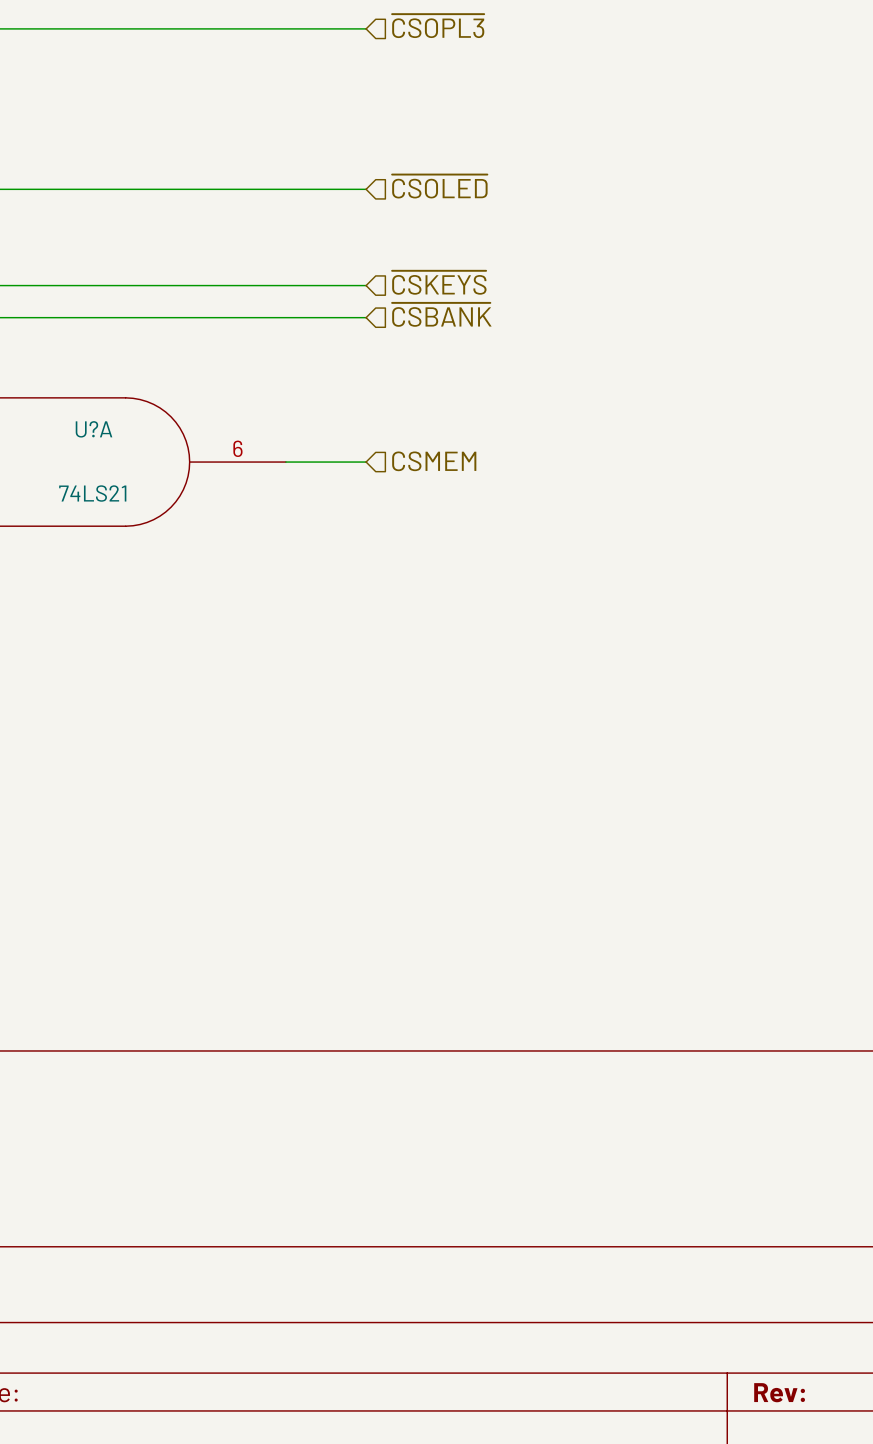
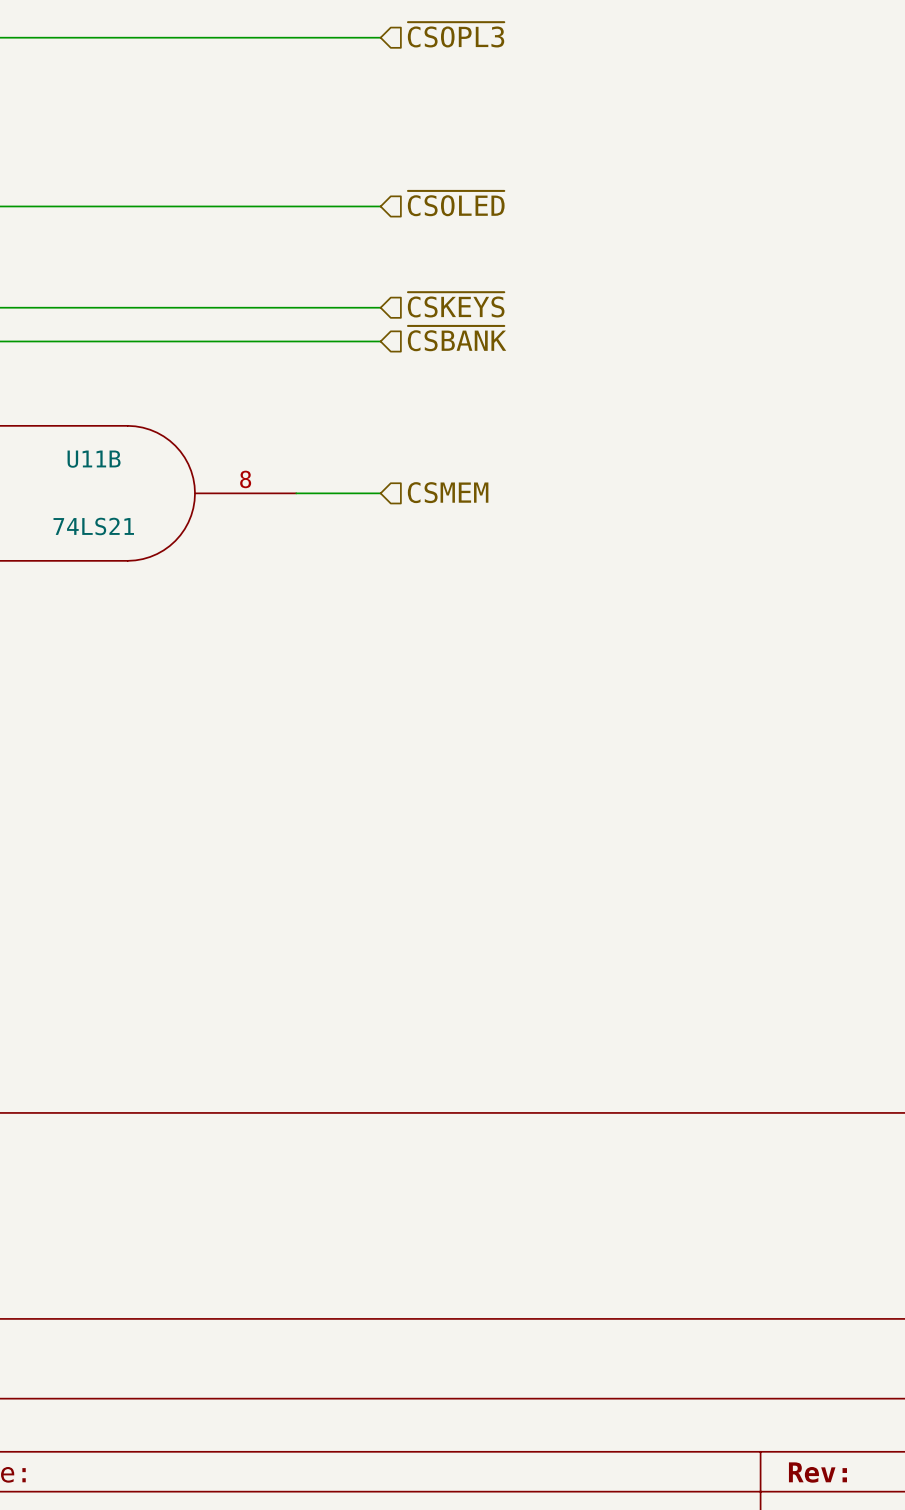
U?A name: U?A (93, 429) -> U11B (94, 459)
U?A pin number: 6 (237, 448) -> 8 (245, 479)

